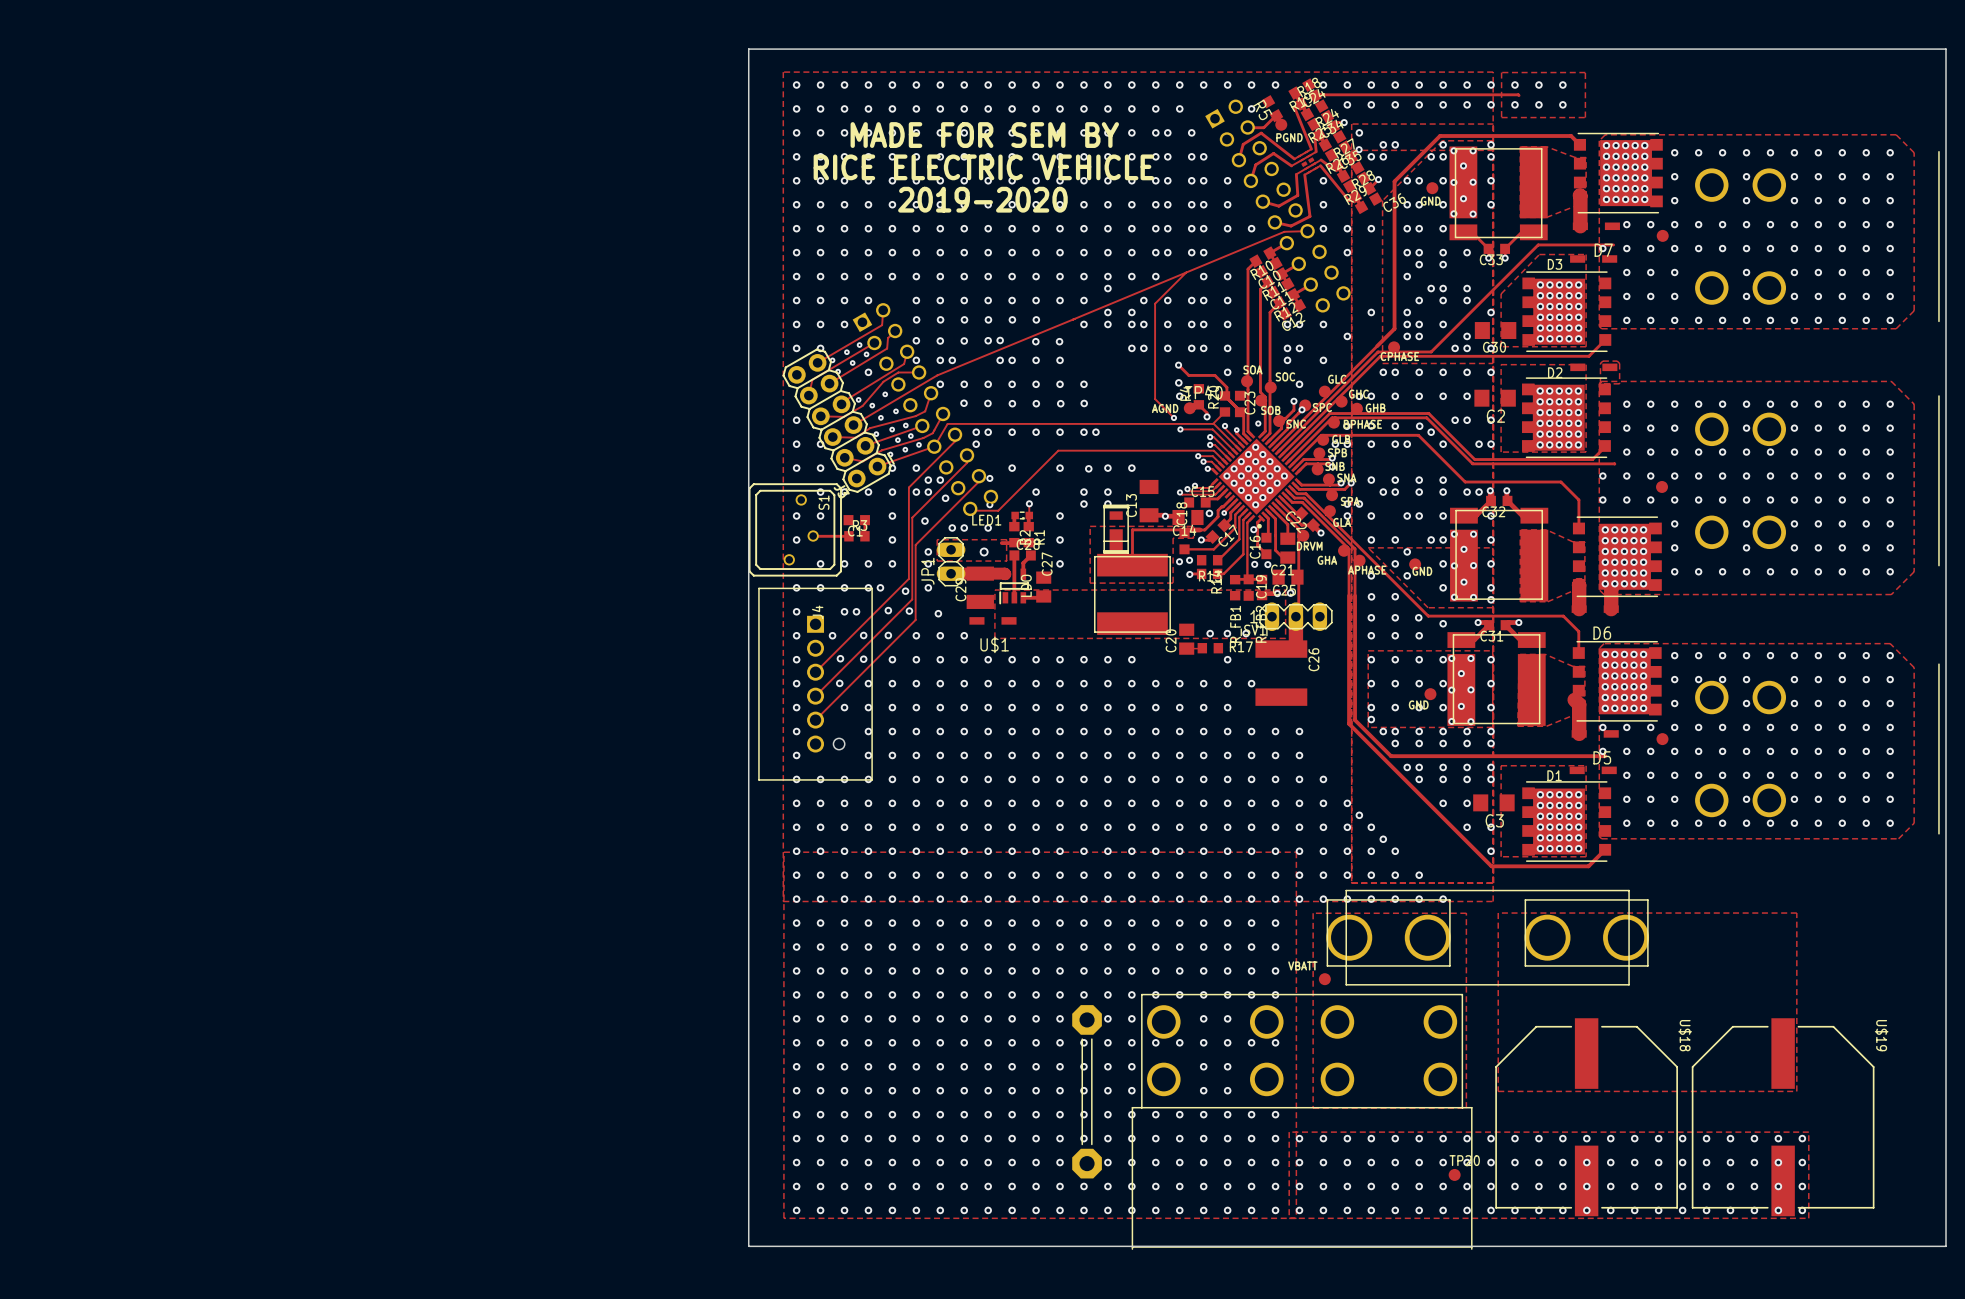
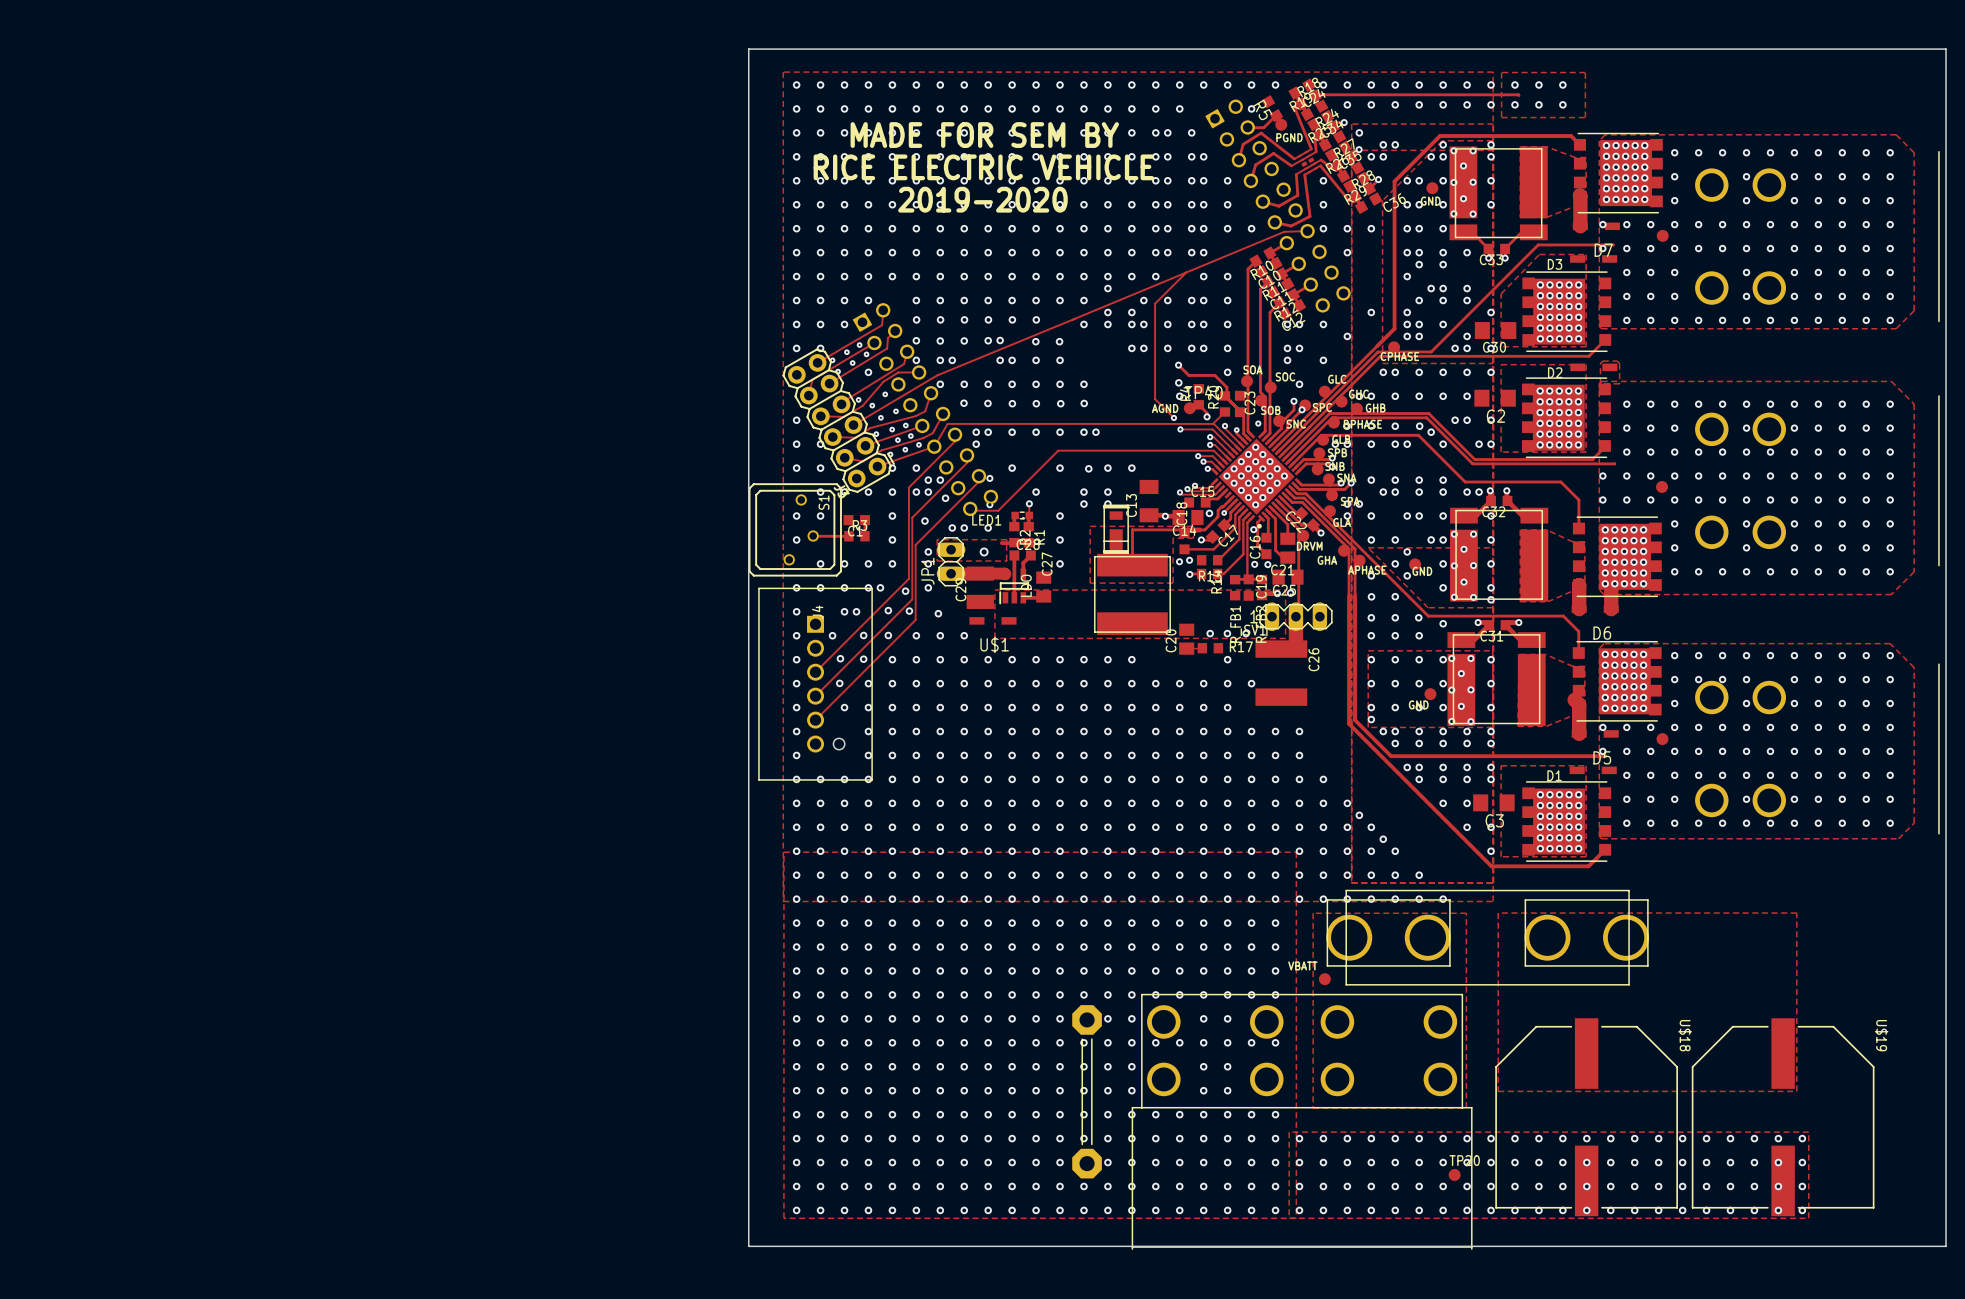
via: none -> (1602, 224)

